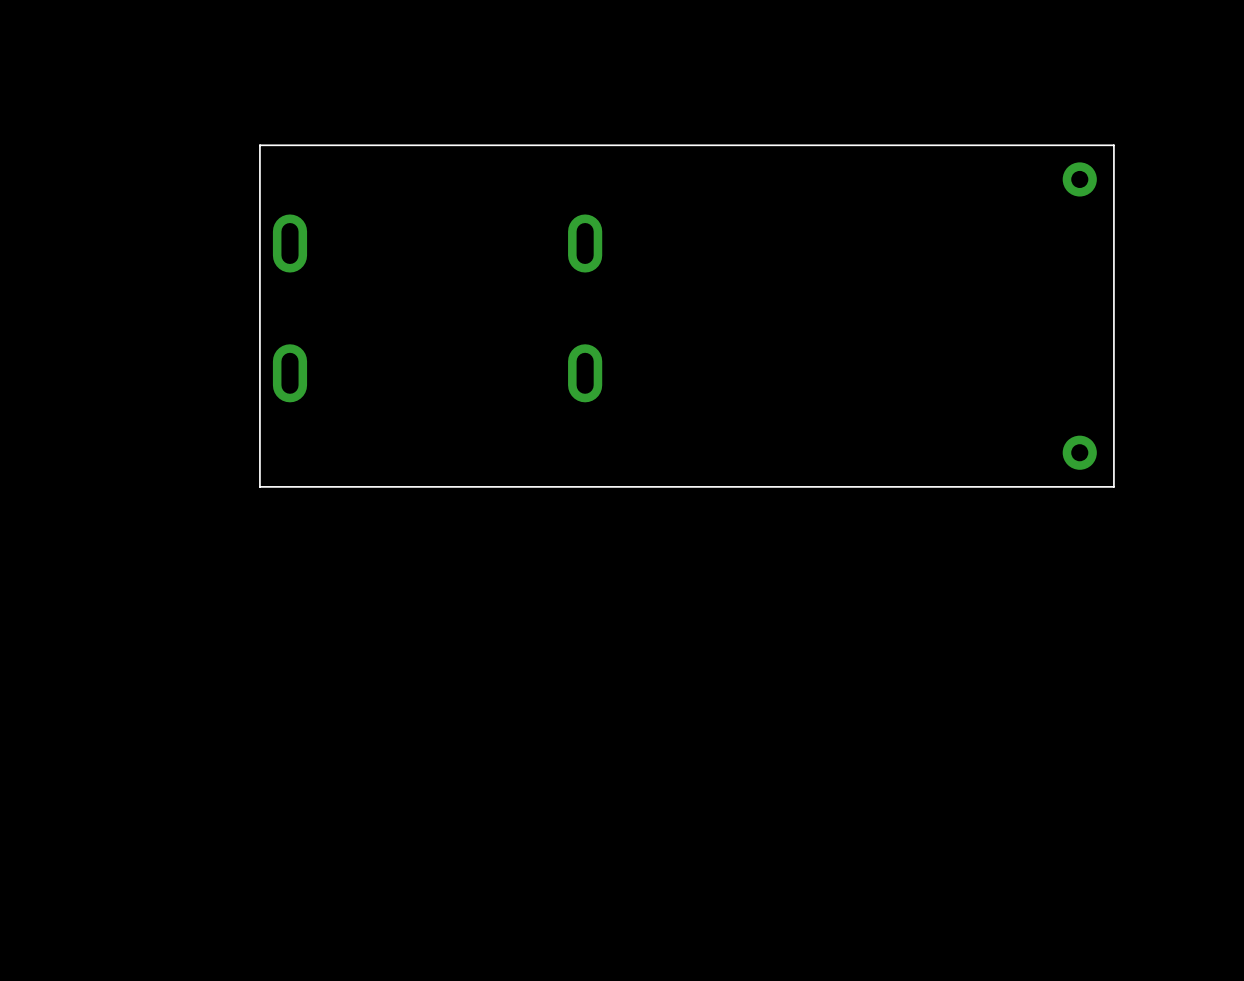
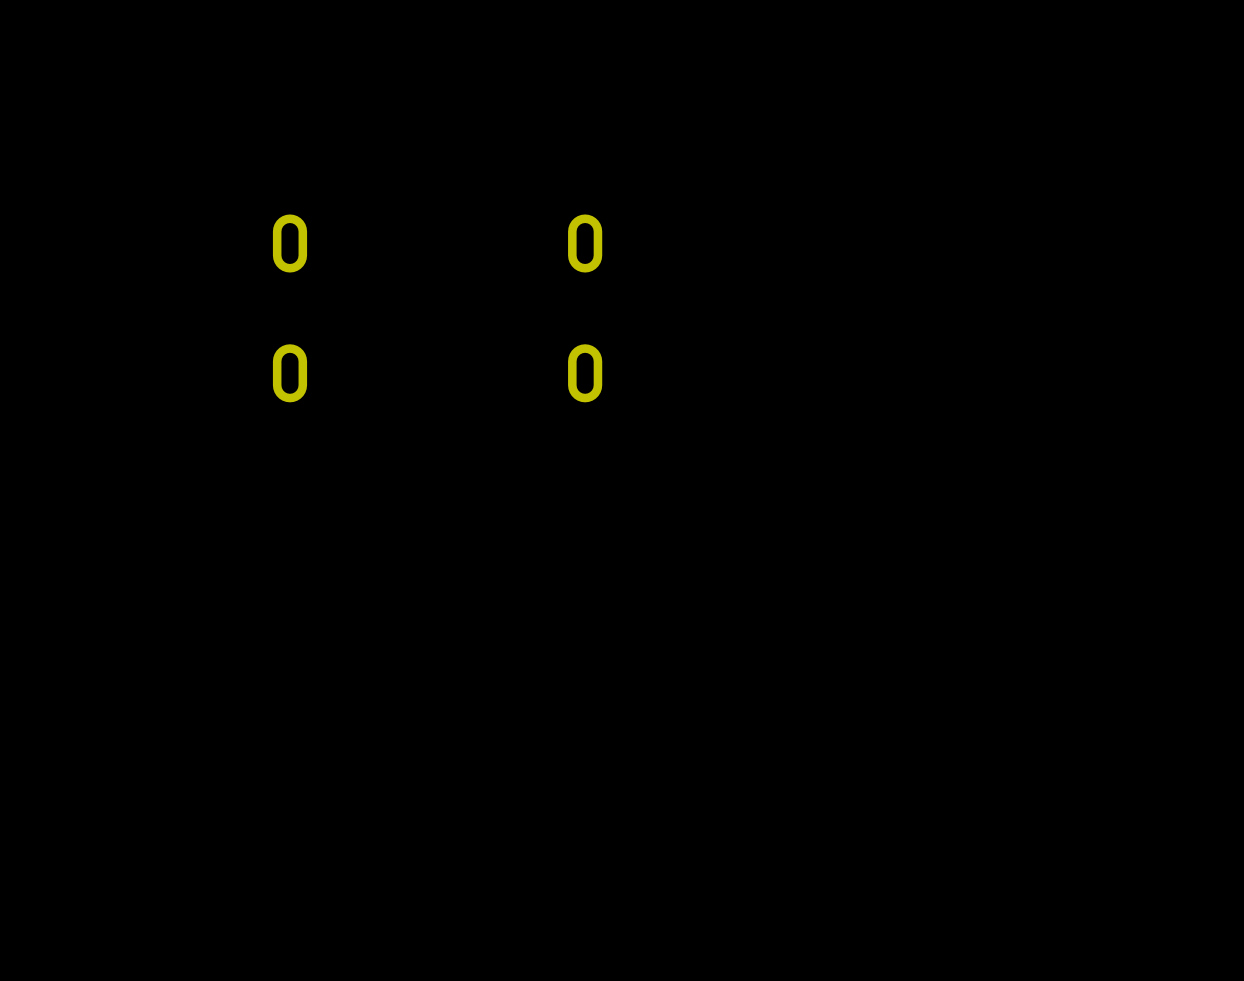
board edge: (1113, 145) (259, 145) (259, 486) (1113, 486) (1113, 145) -> none
part: (1079, 179) -> none
part: (1079, 452) -> none

